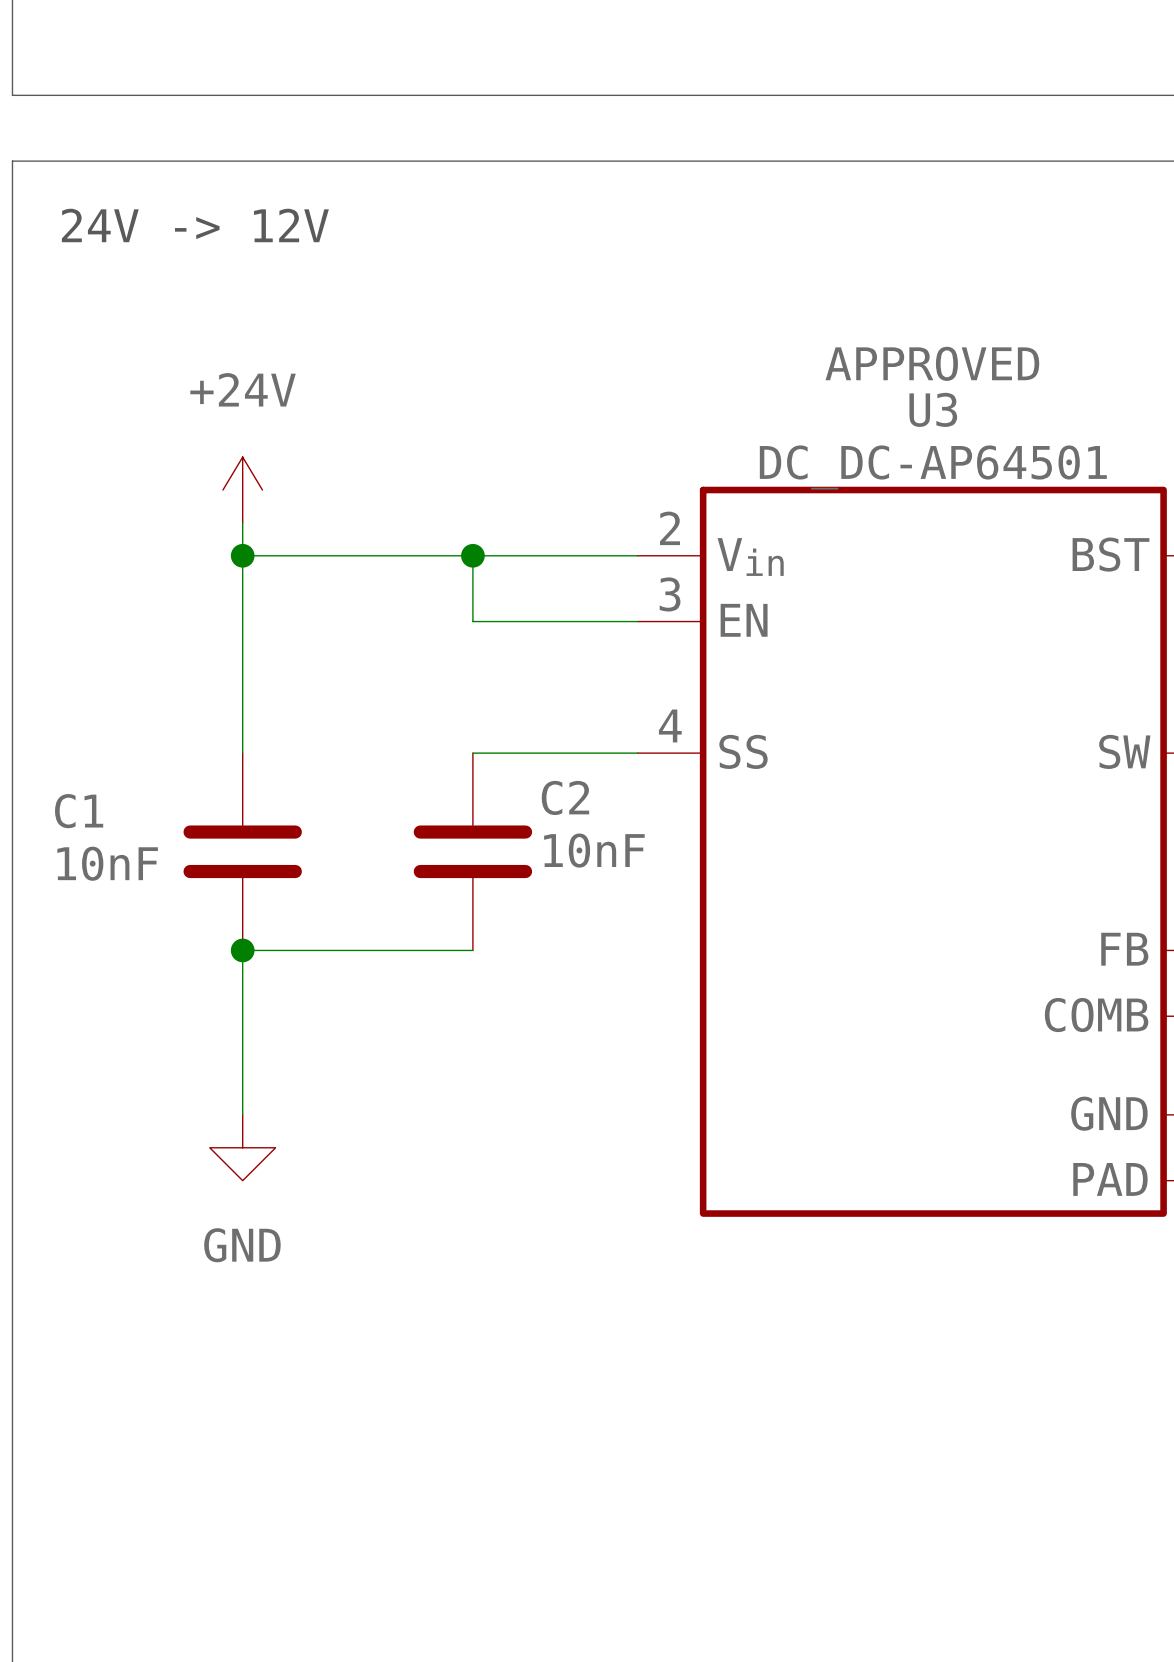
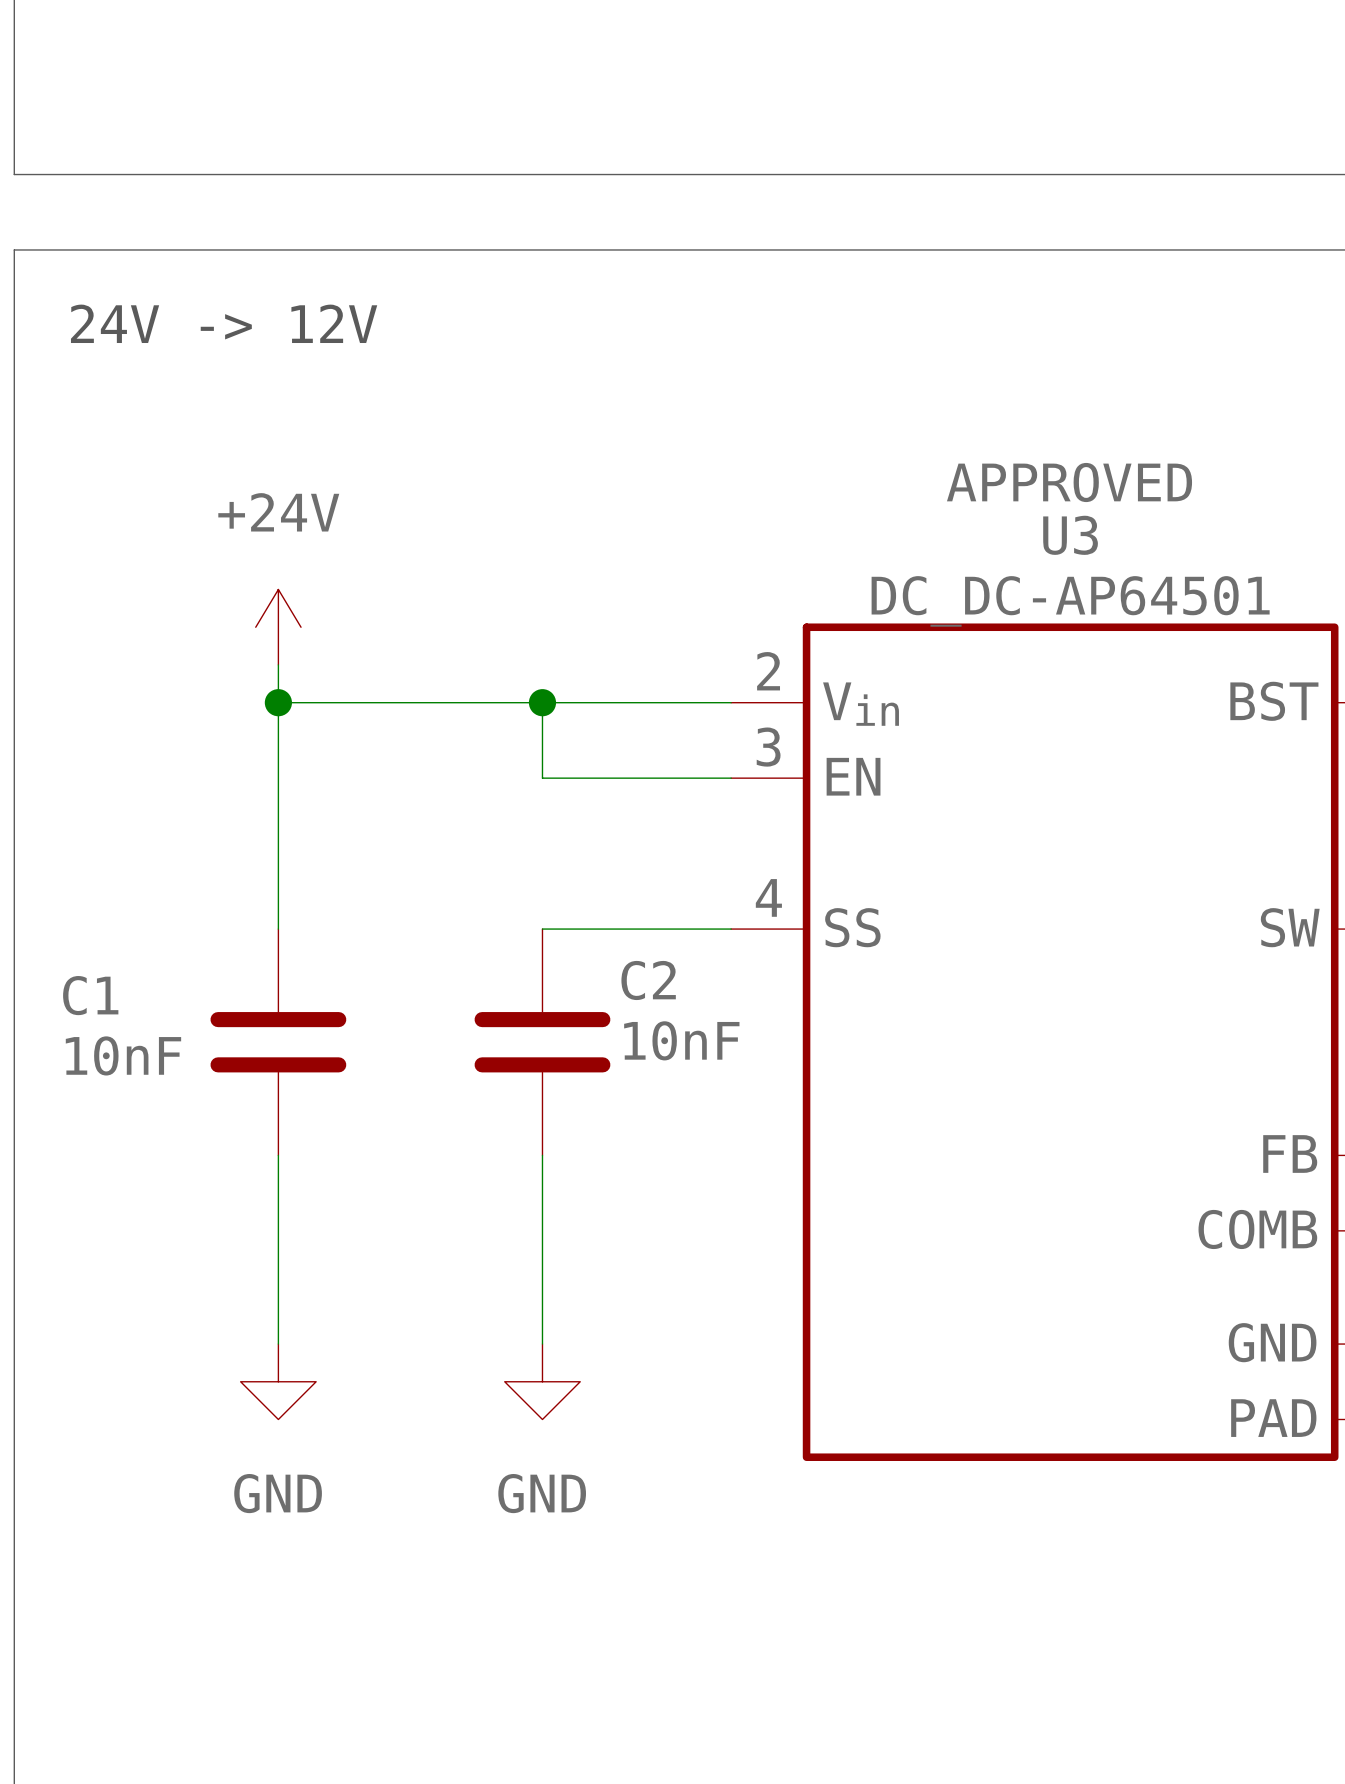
wire: (242, 950) (472, 950) -> (542, 1344) (542, 1155)
junction: (242, 950) -> none
power symbol: none -> GND (542, 1381)

